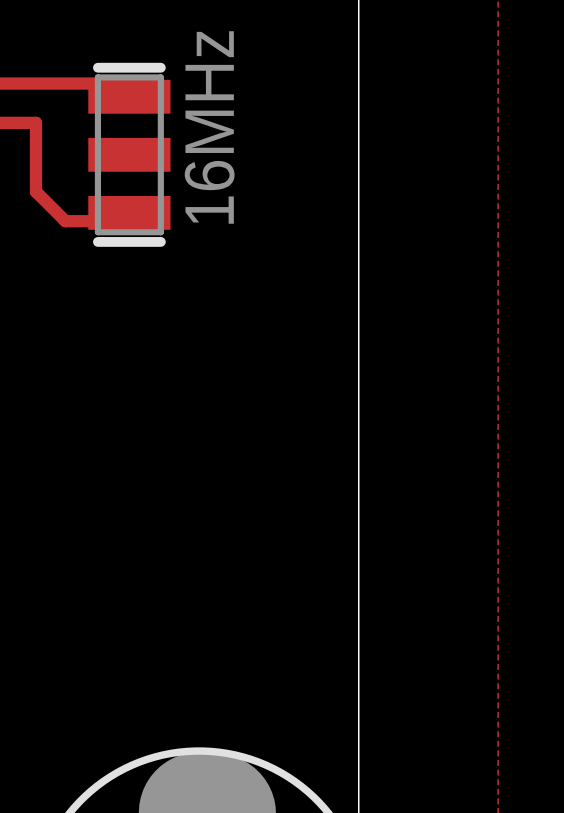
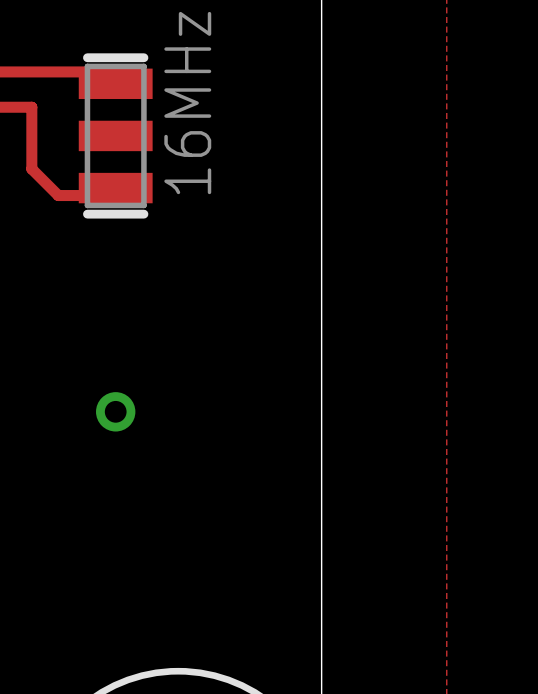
via: none -> (115, 411)

